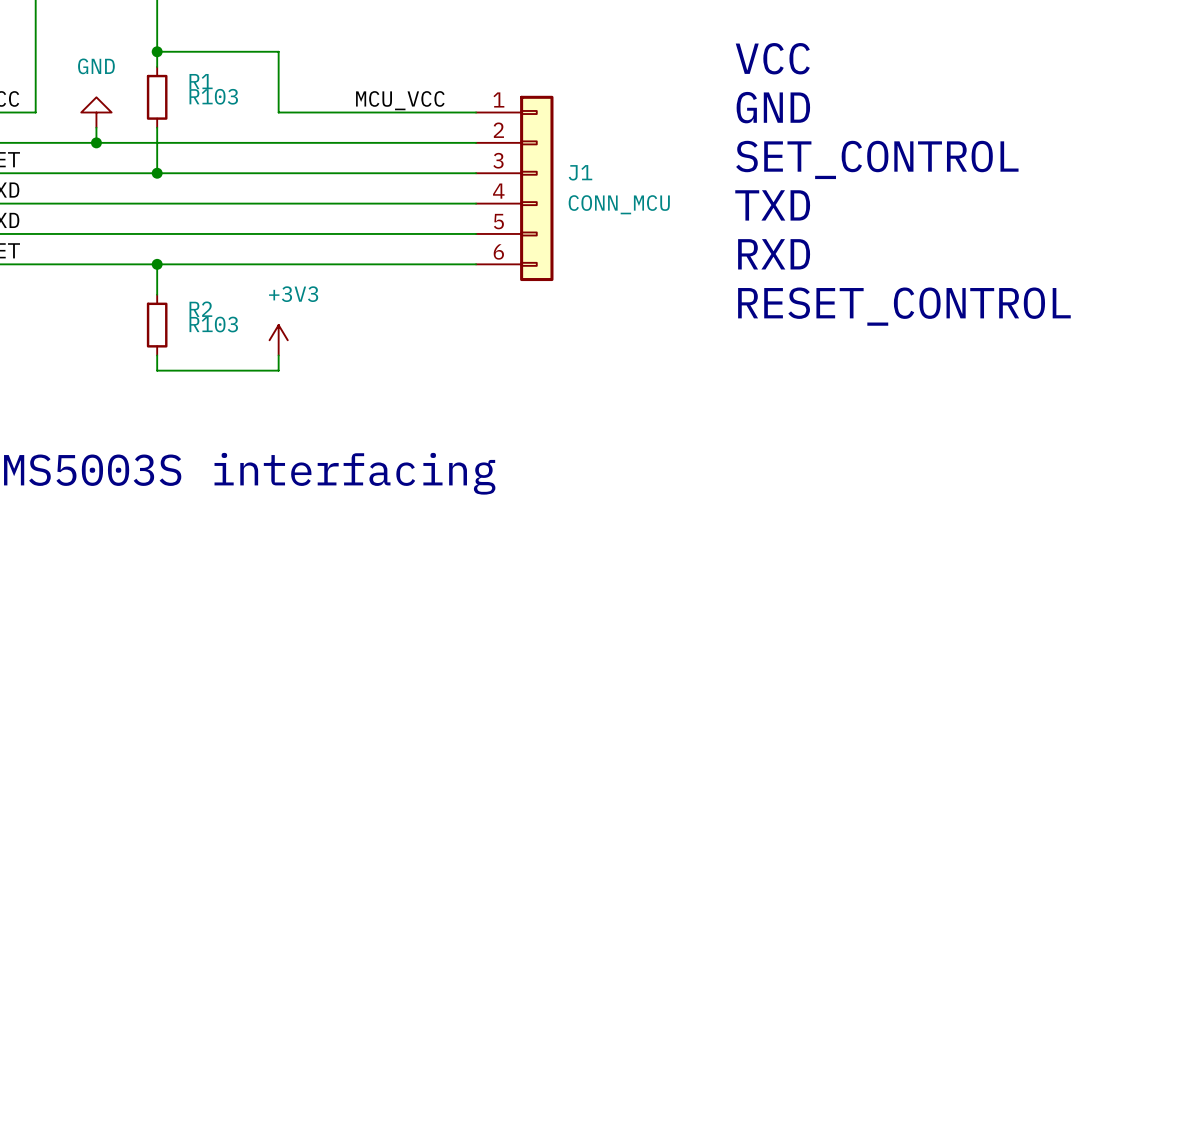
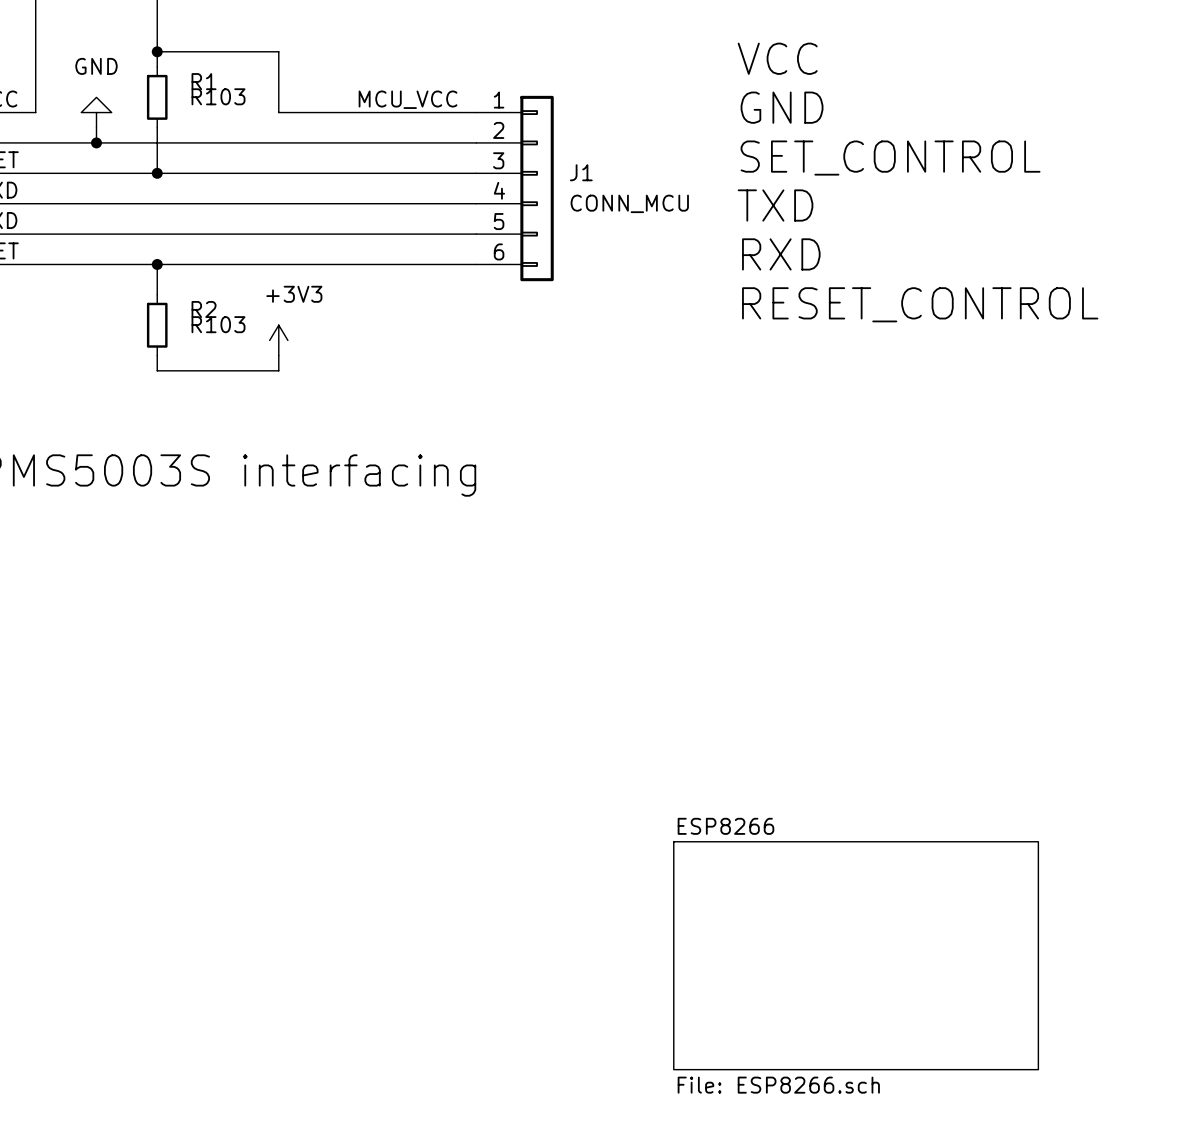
sheet ESP8266: none -> File: ESP8266.sch (856, 955)

